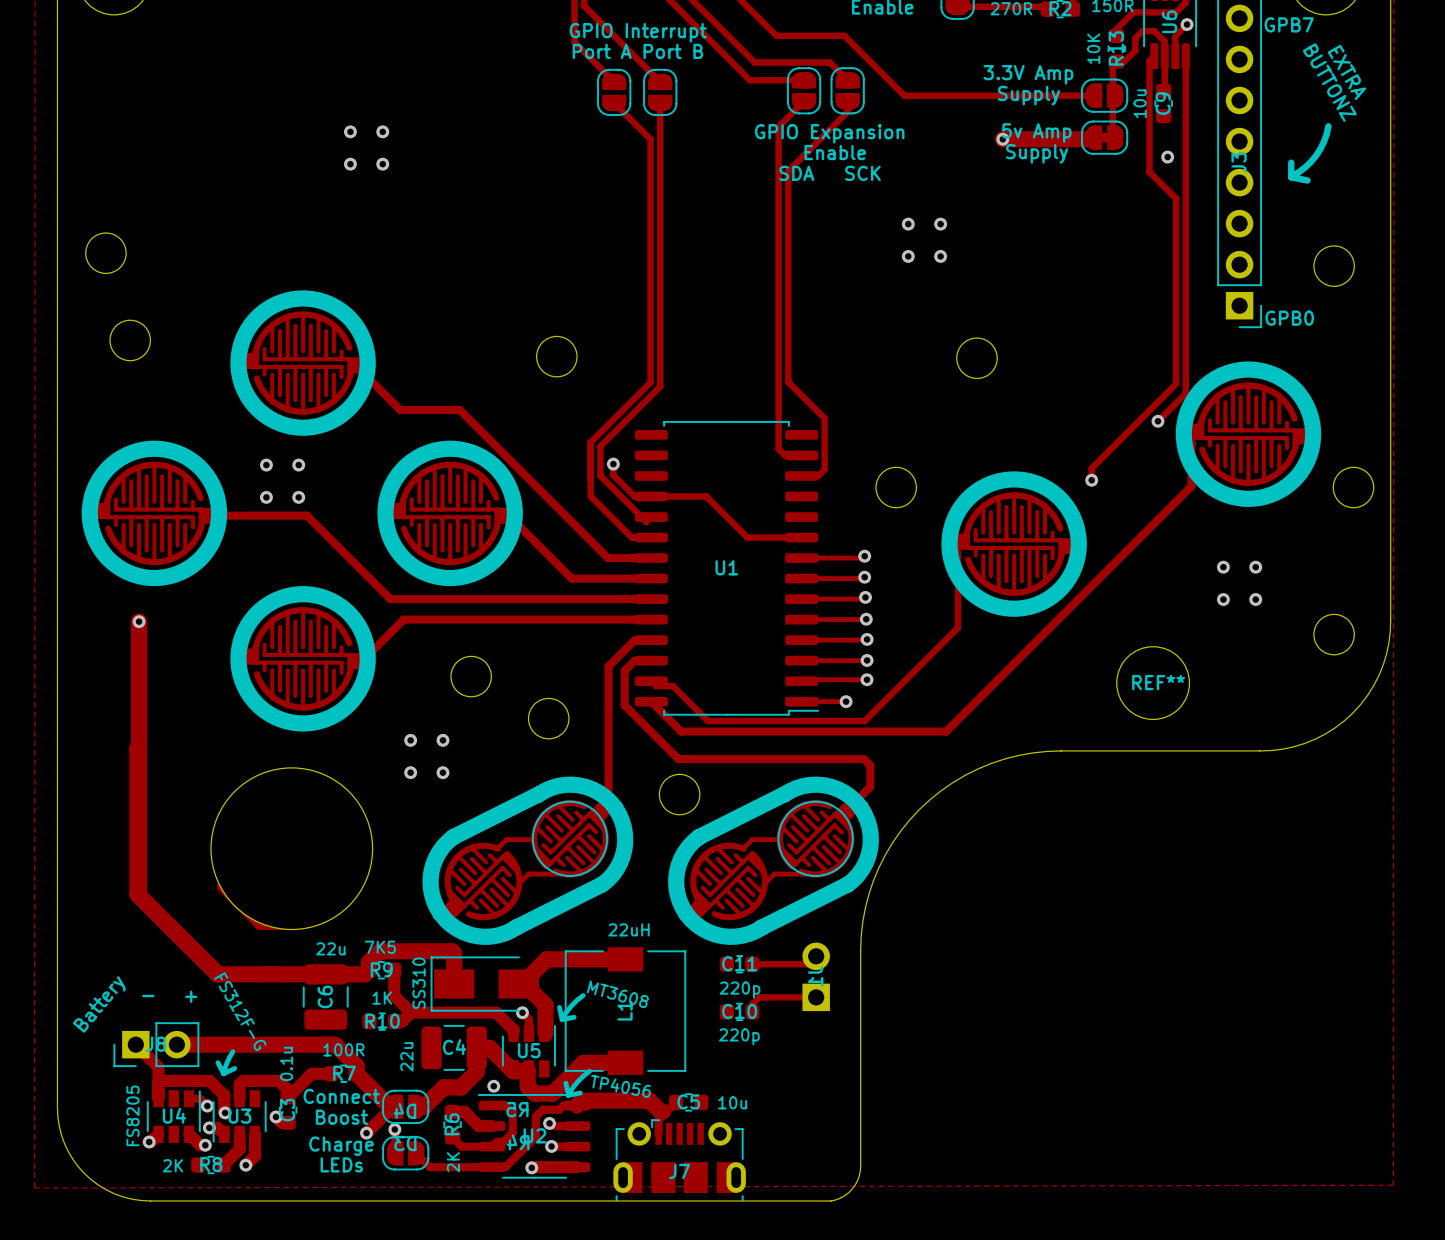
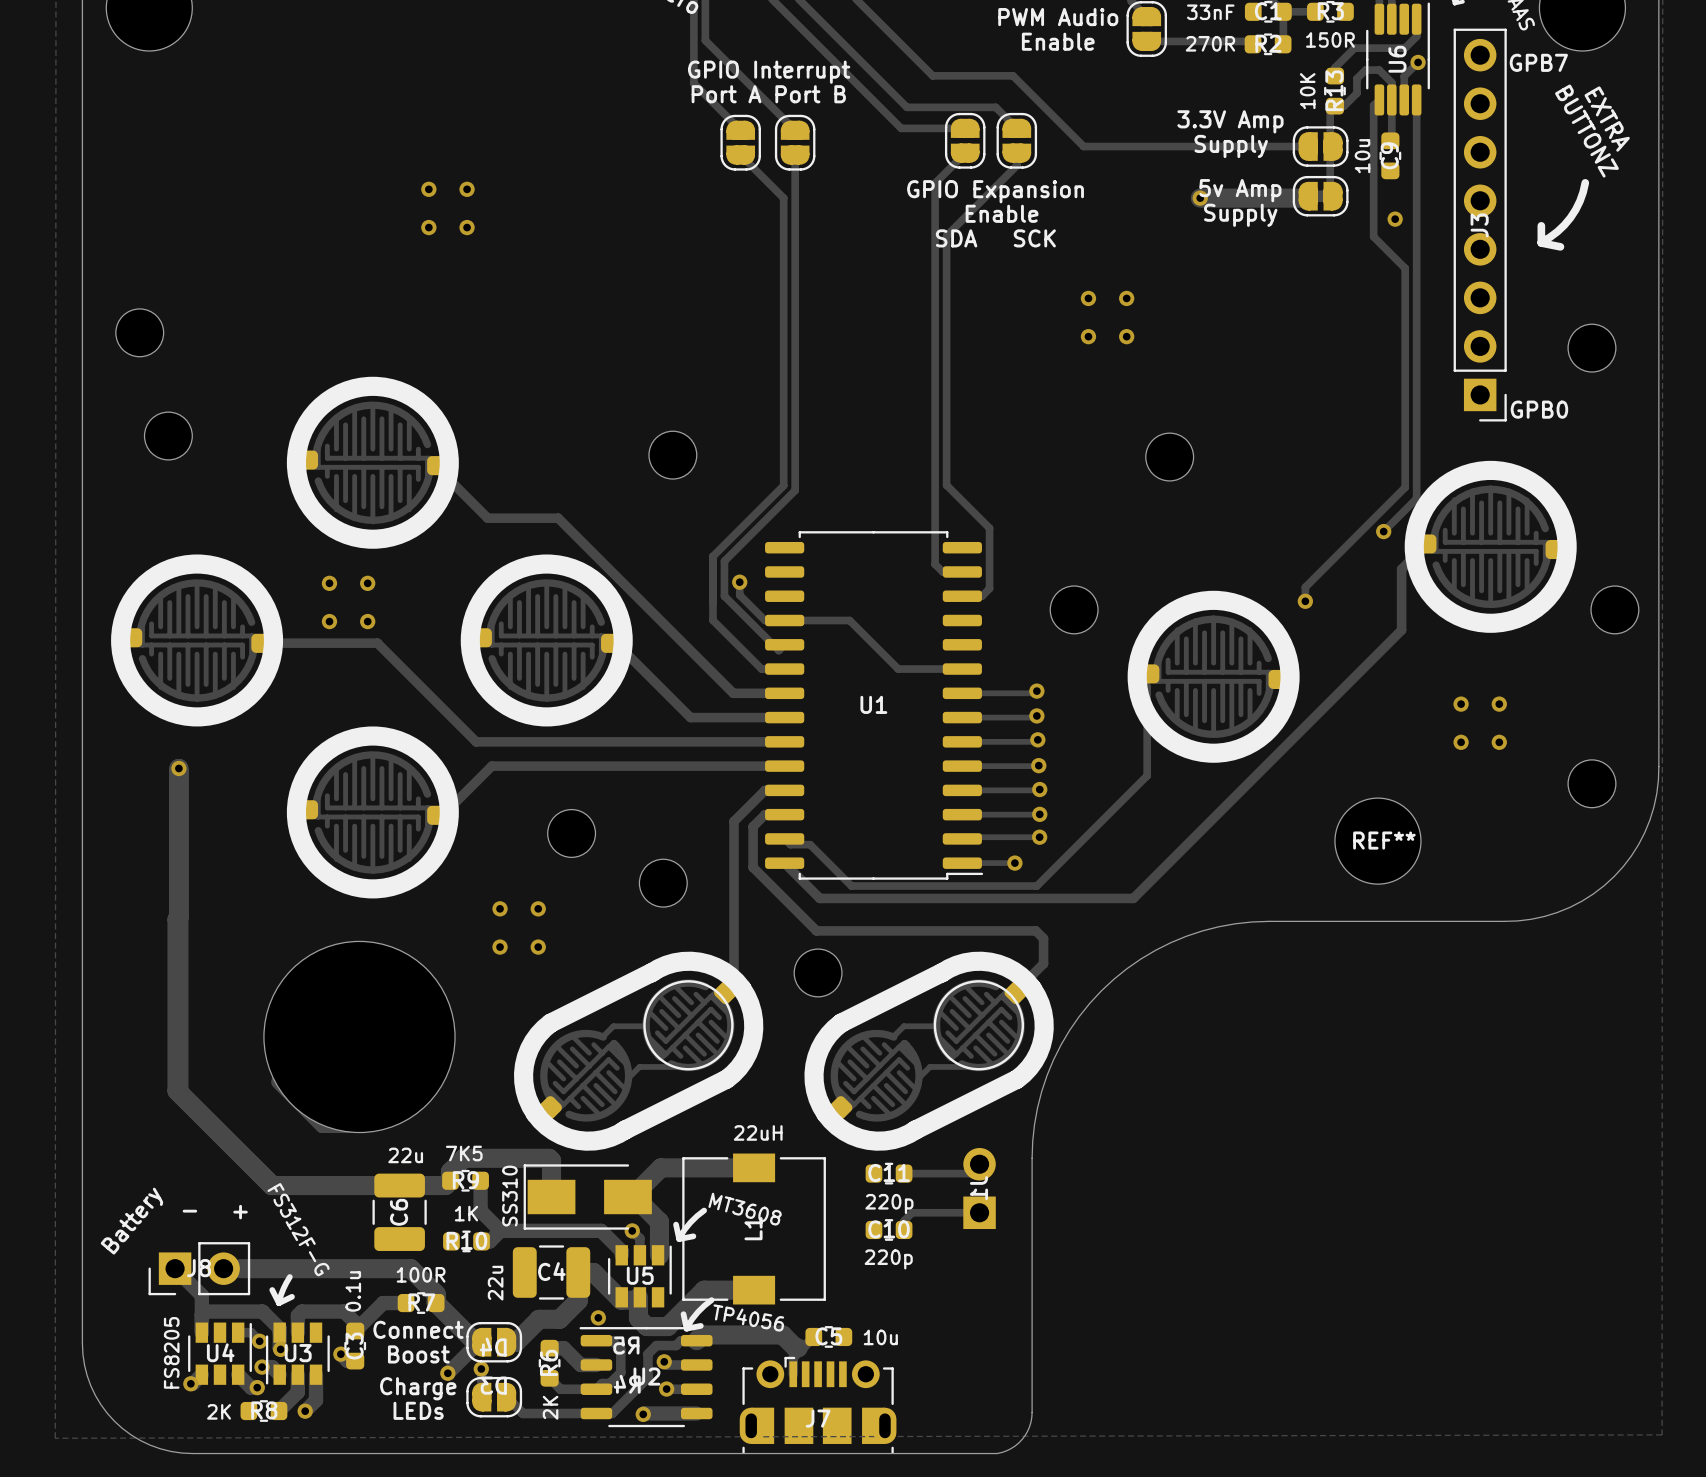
track: (1190, 439) (1191, 486) (1173, 504) -> (1420, 543) (1420, 550) (1401, 569) (1401, 630)

